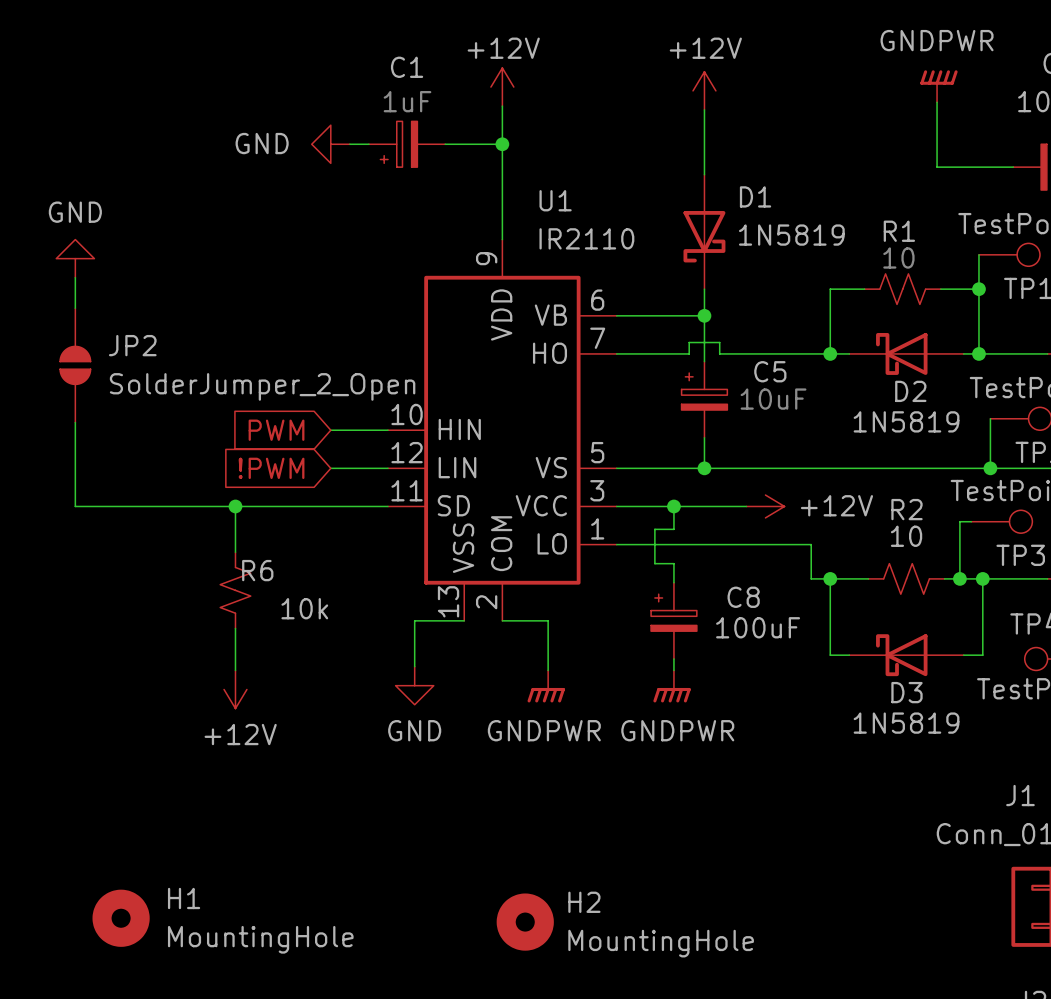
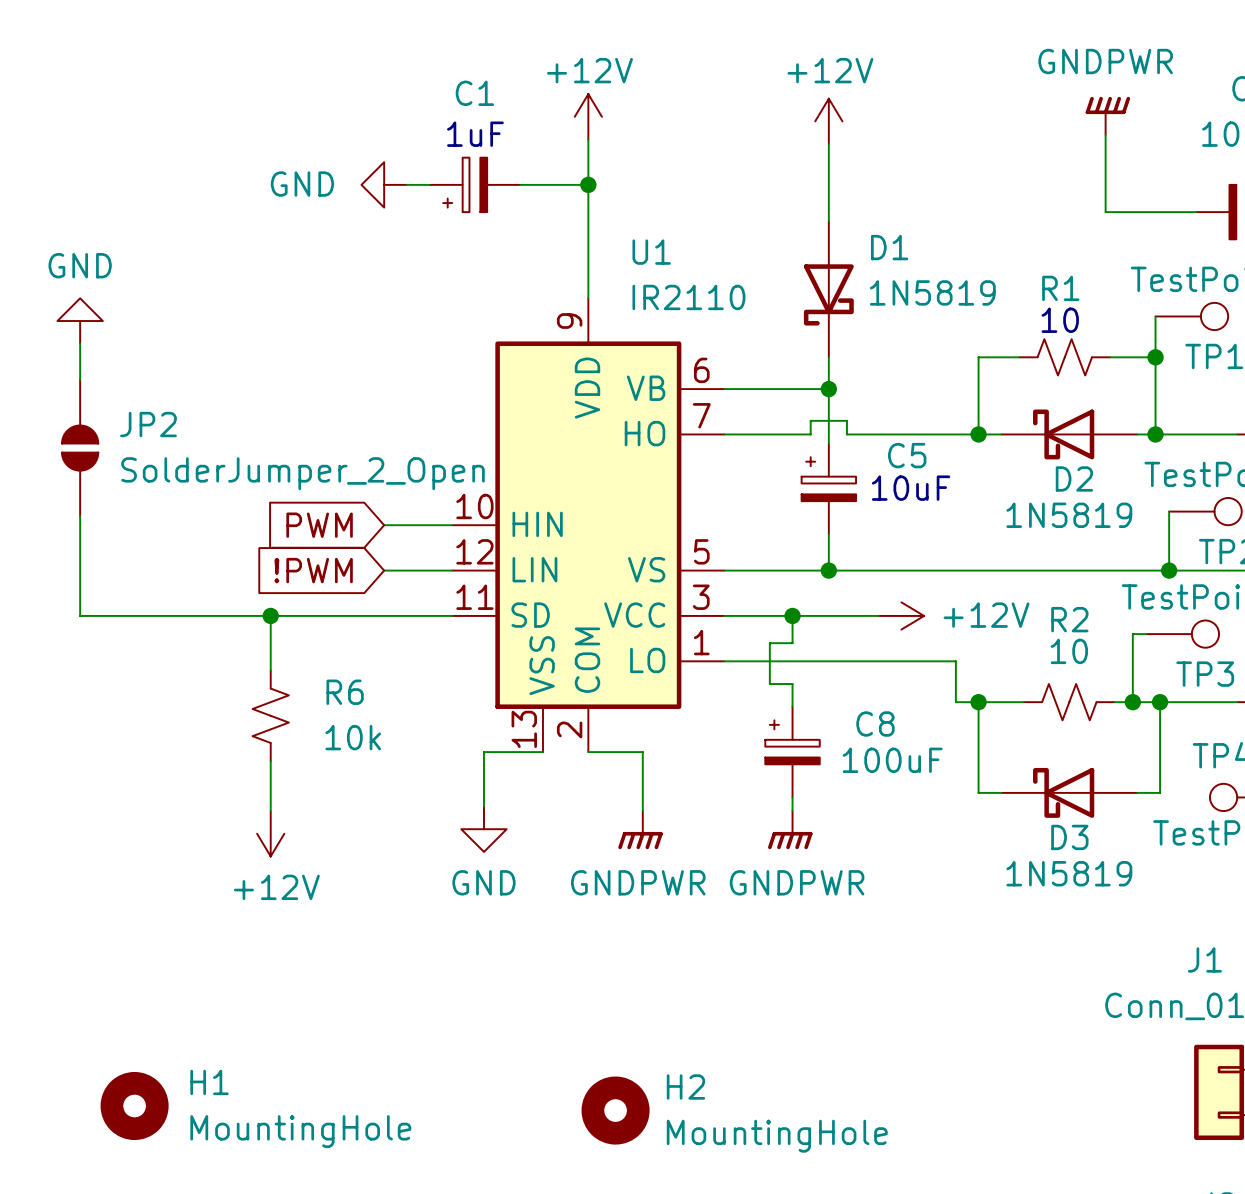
R6 name position: R6 (257, 570) -> R6 (345, 692)

